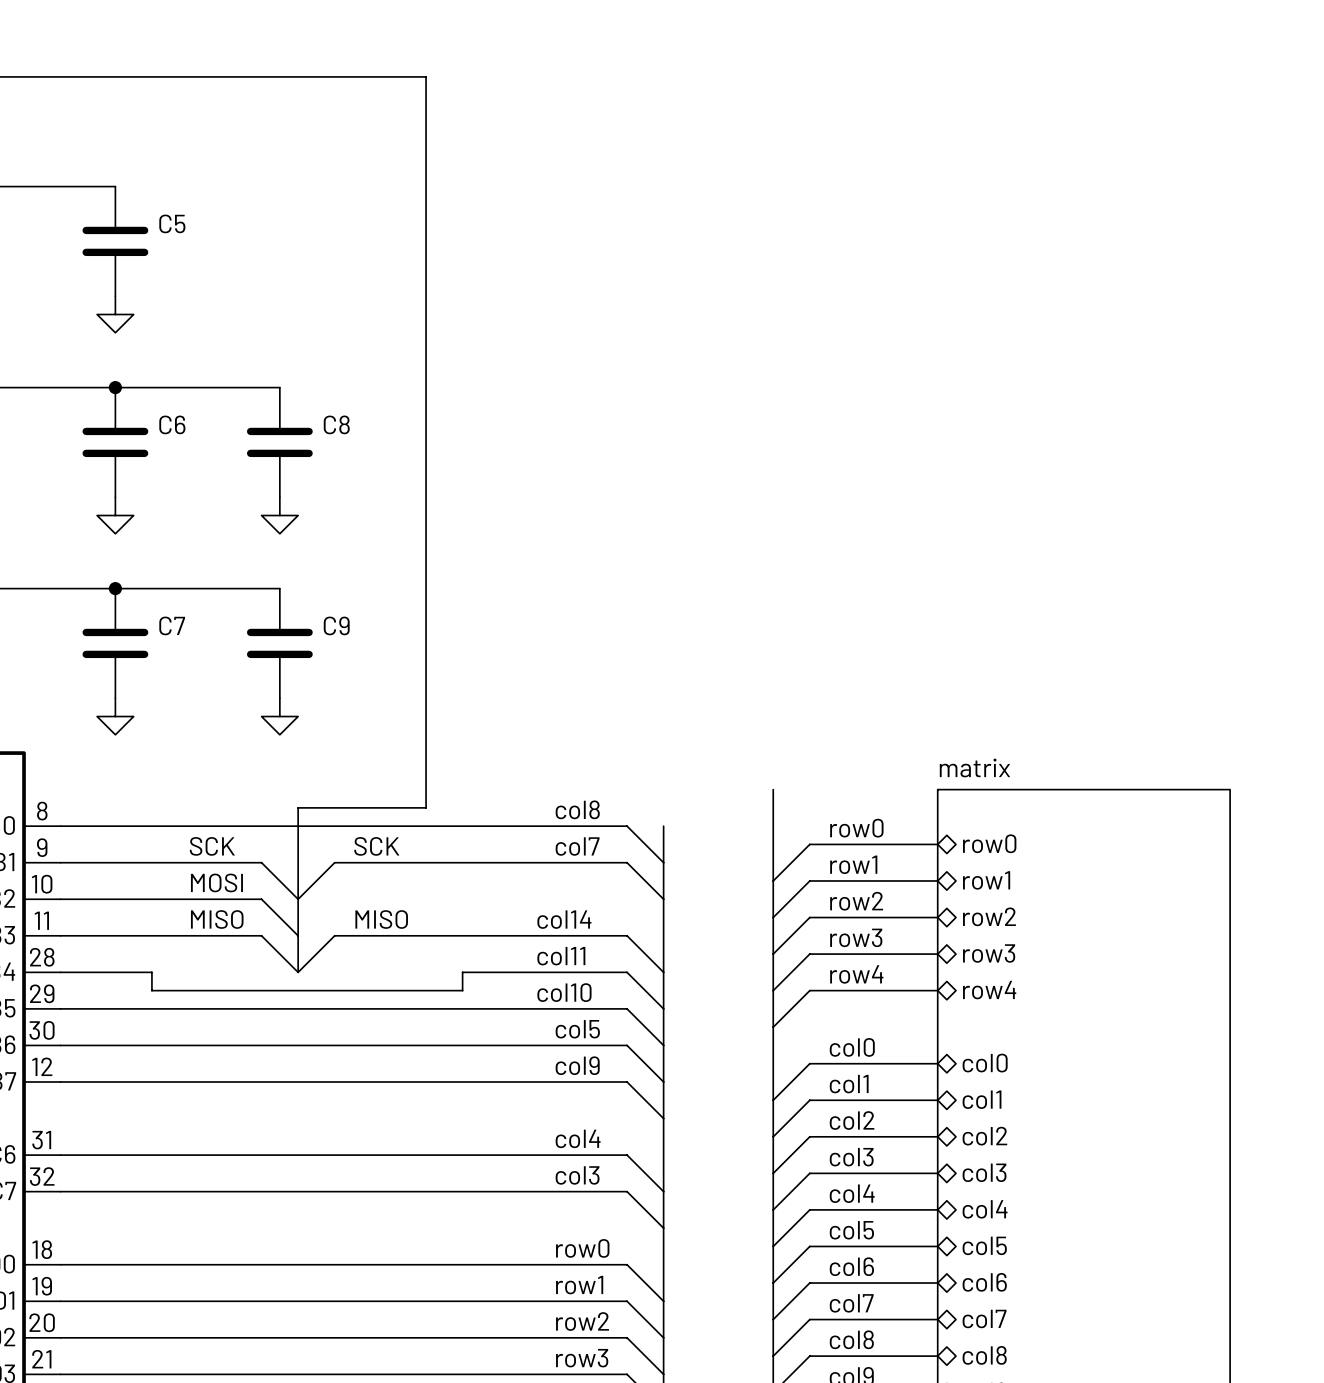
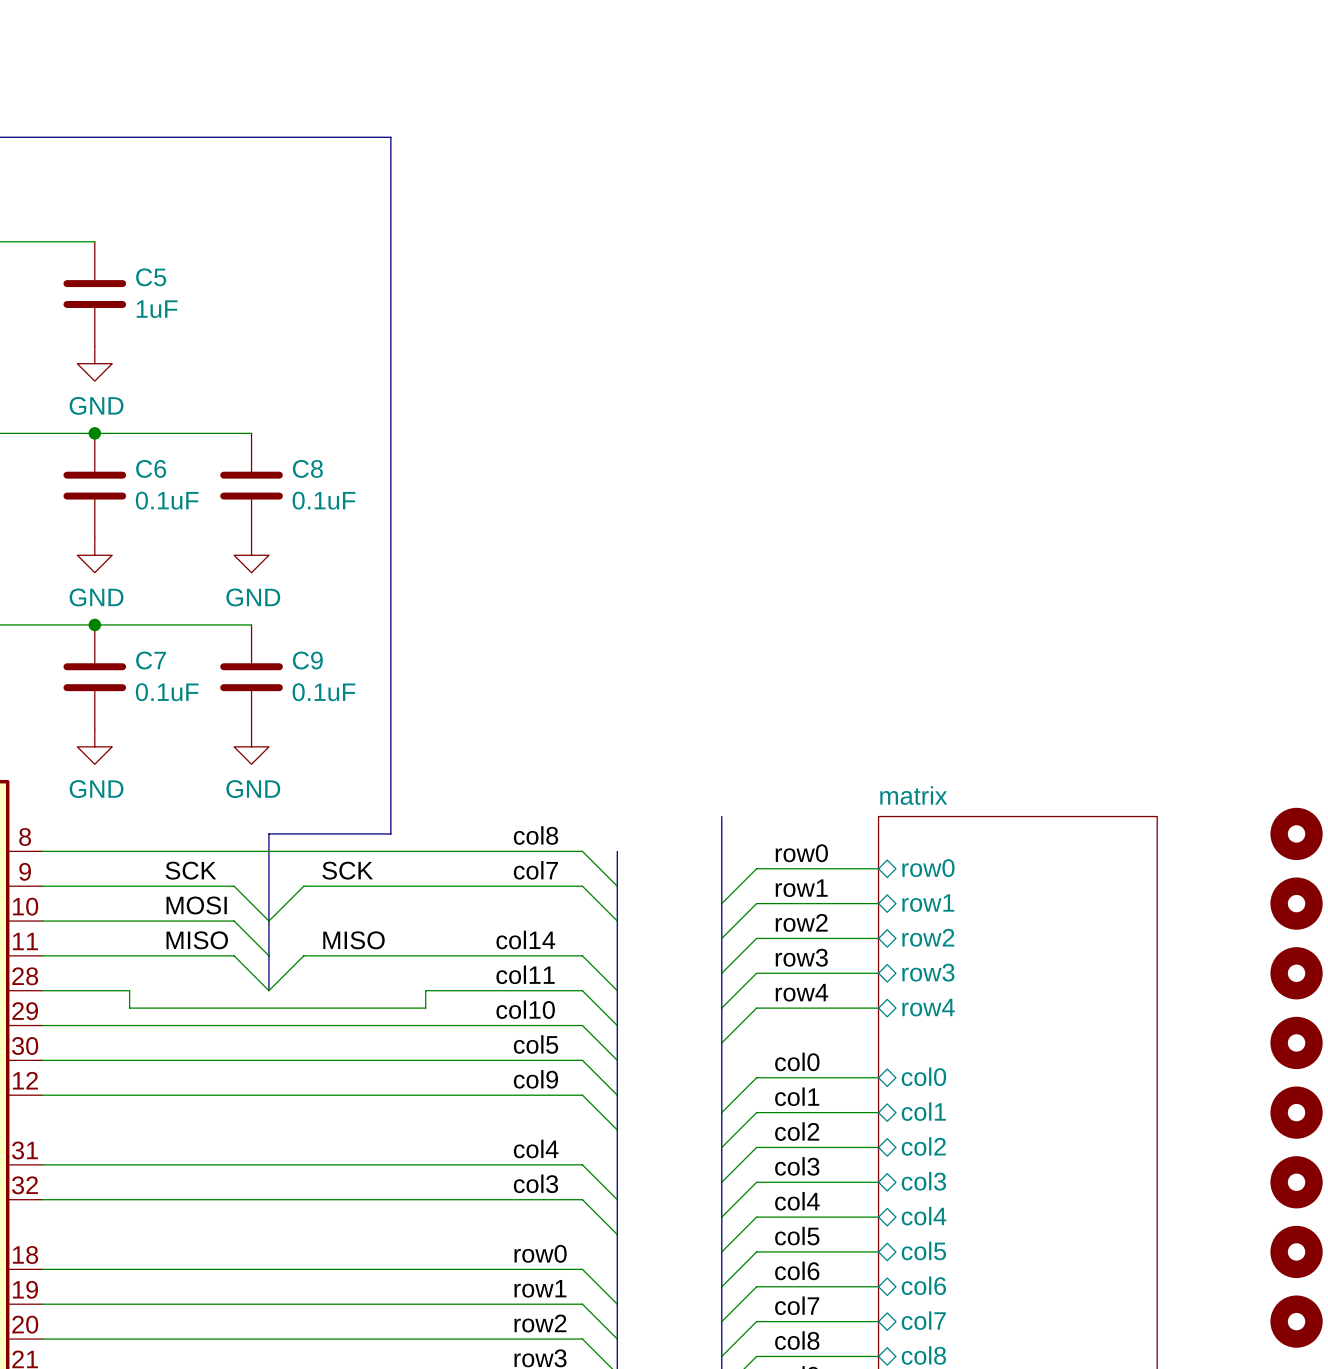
C5 value: none -> 1uF (157, 309)
power symbol text: none -> GND (96, 405)
C6 value: none -> 0.1uF (167, 500)
C8 value: none -> 0.1uF (323, 500)
power symbol text: none -> GND (96, 597)
power symbol text: none -> GND (253, 597)
C7 value: none -> 0.1uF (167, 692)
C9 value: none -> 0.1uF (323, 692)
power symbol text: none -> GND (96, 789)
power symbol text: none -> GND (253, 789)

